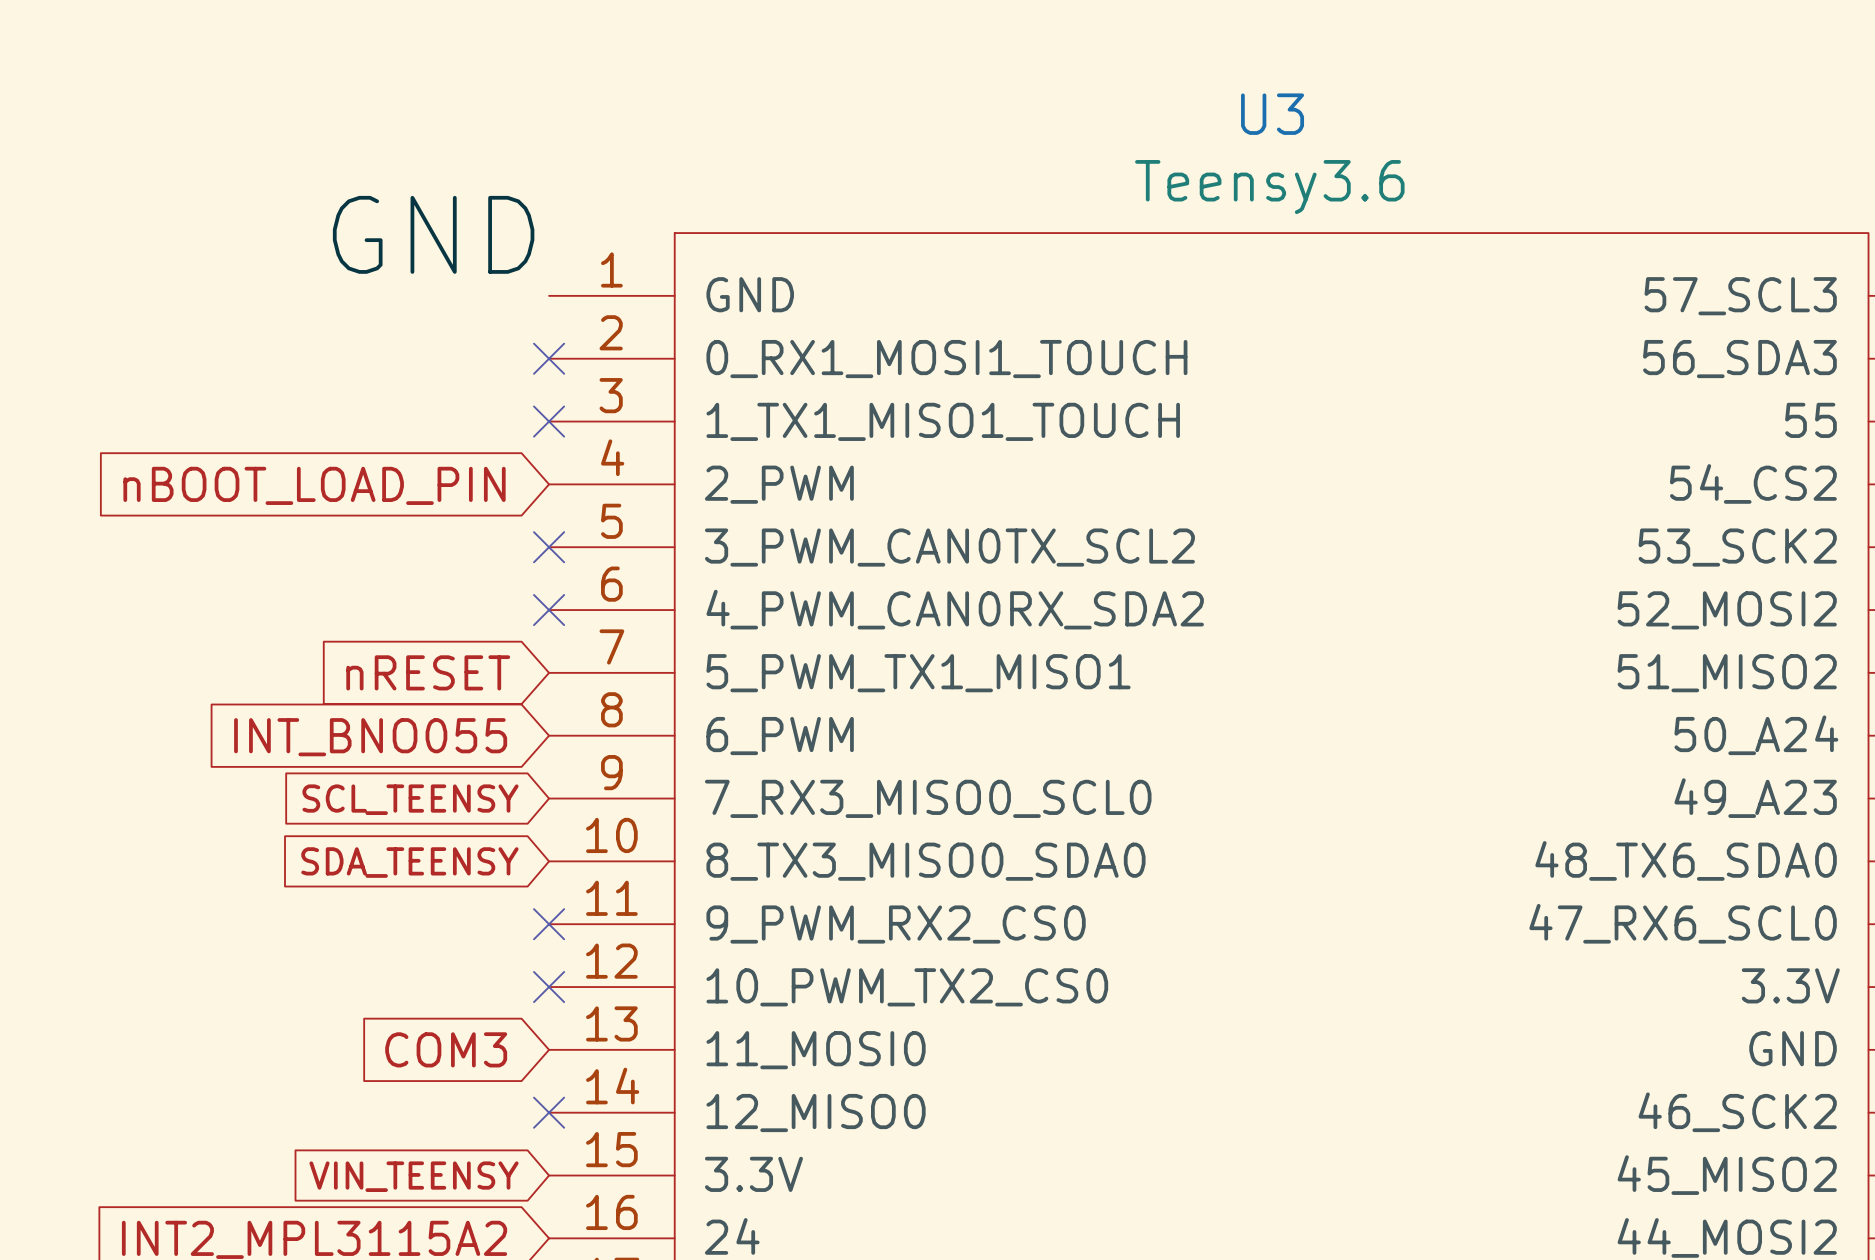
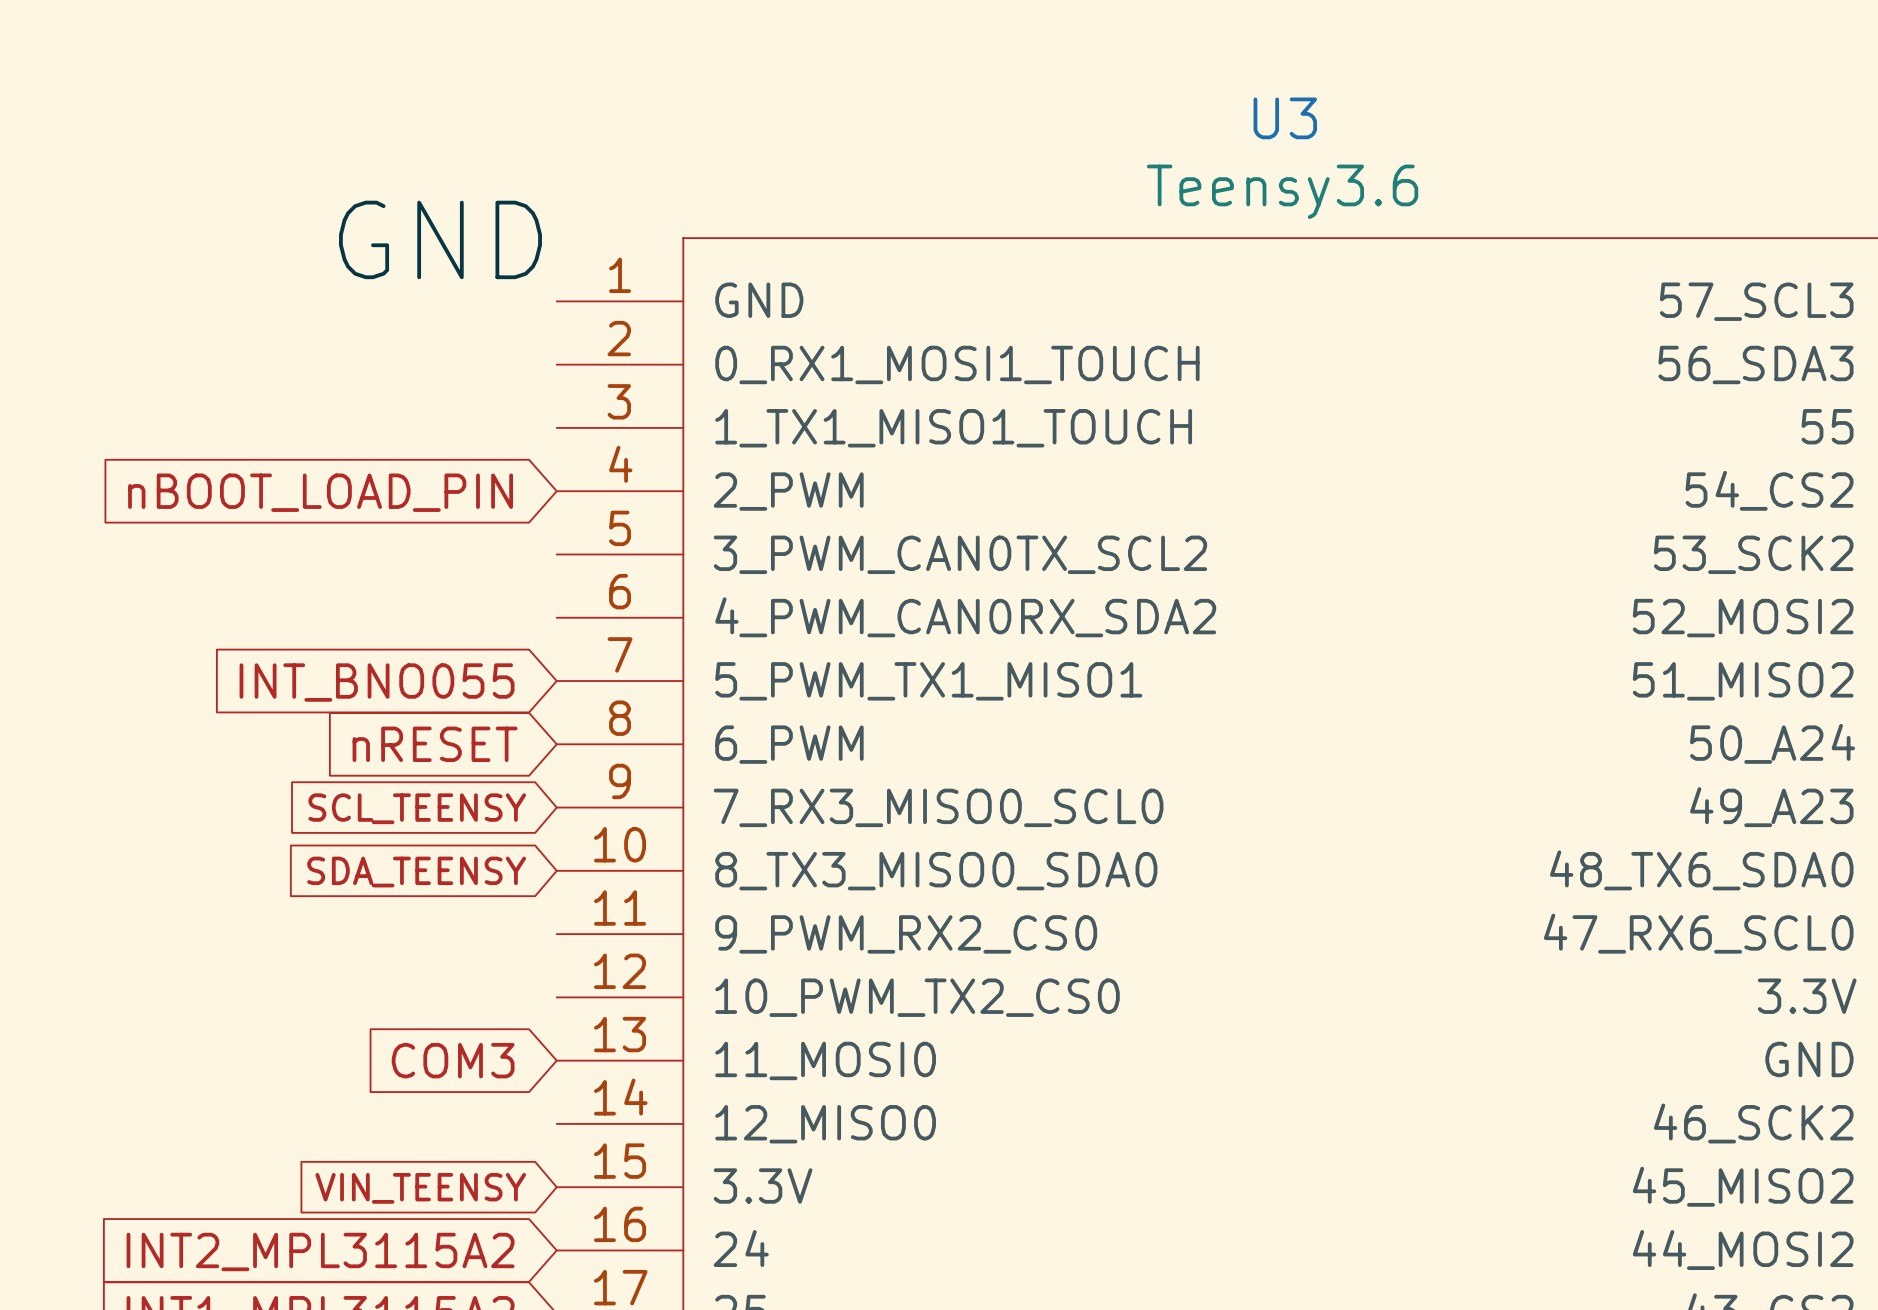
no-connect mark: (549, 358) -> none
no-connect mark: (549, 421) -> none
no-connect mark: (549, 547) -> none
no-connect mark: (549, 610) -> none
global label: nRESET (428, 672) -> INT_BNO055 (377, 682)
global label: INT_BNO055 (370, 737) -> nRESET (435, 744)
no-connect mark: (549, 924) -> none
no-connect mark: (549, 987) -> none
no-connect mark: (549, 1112) -> none

